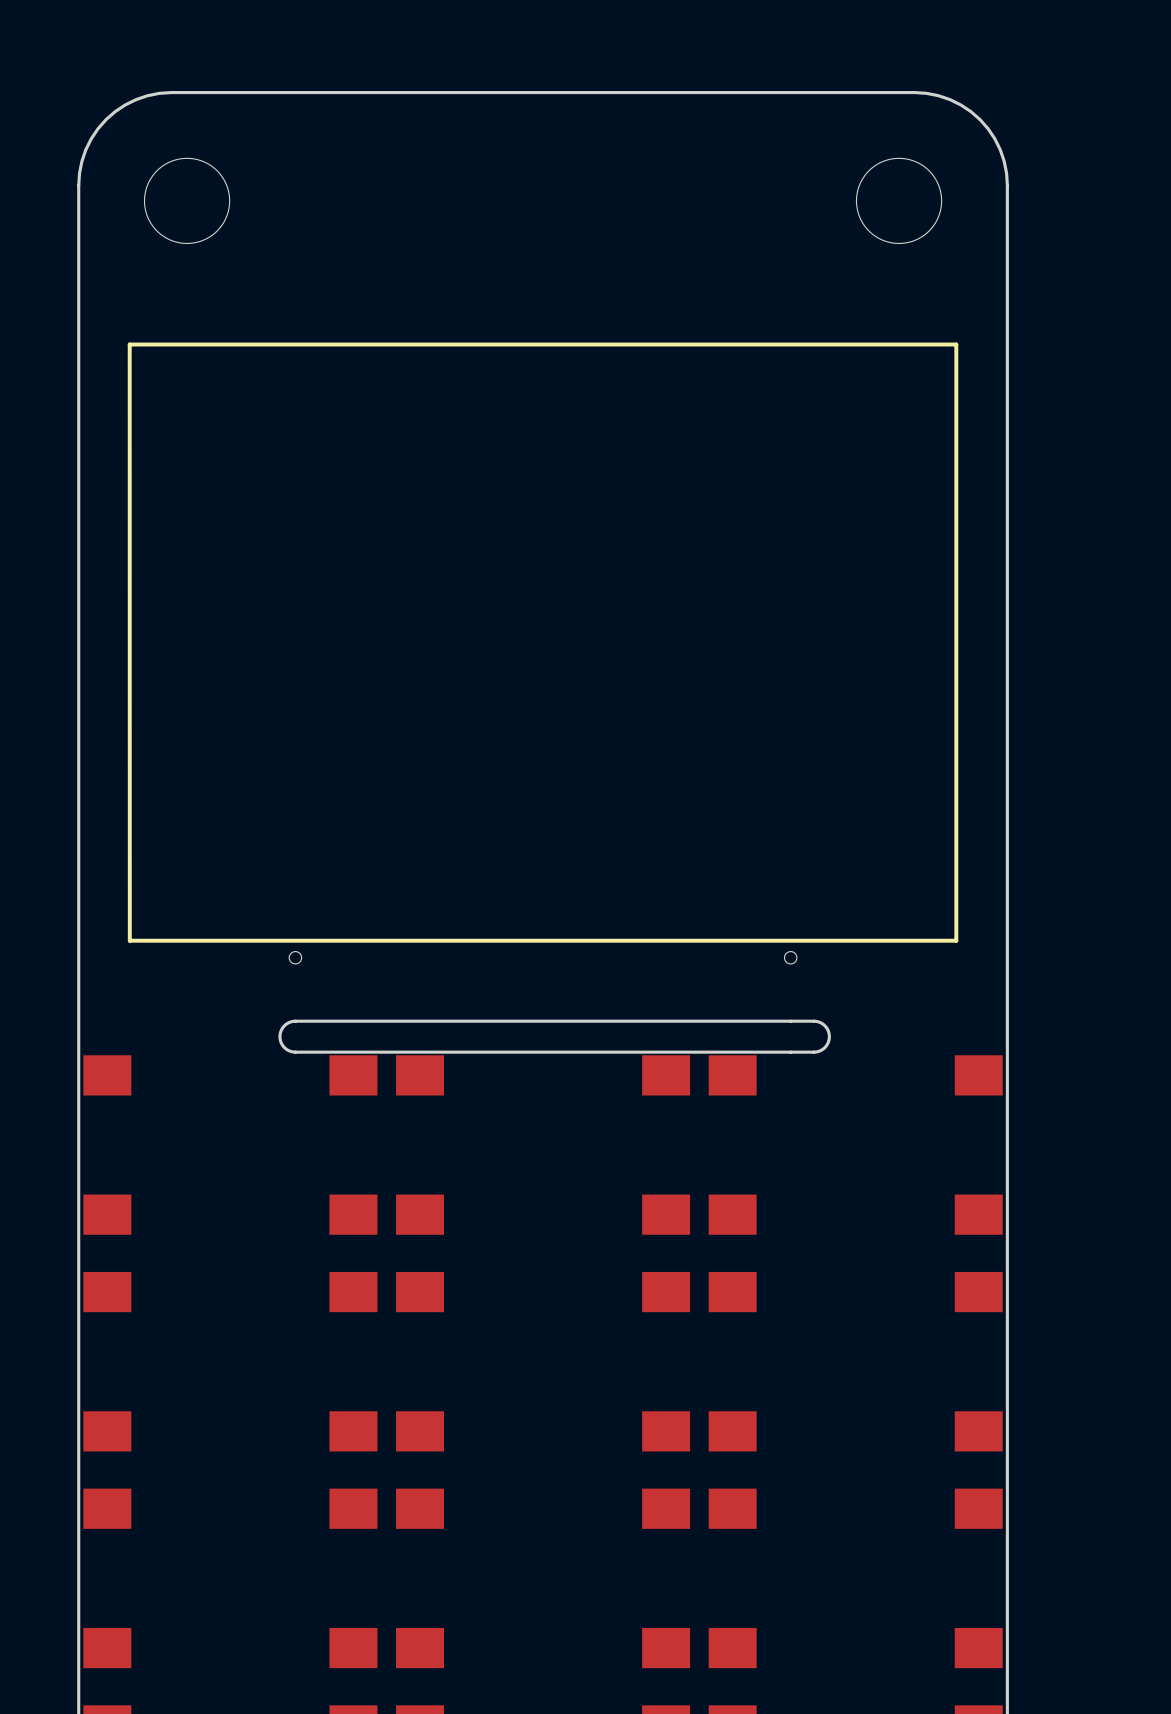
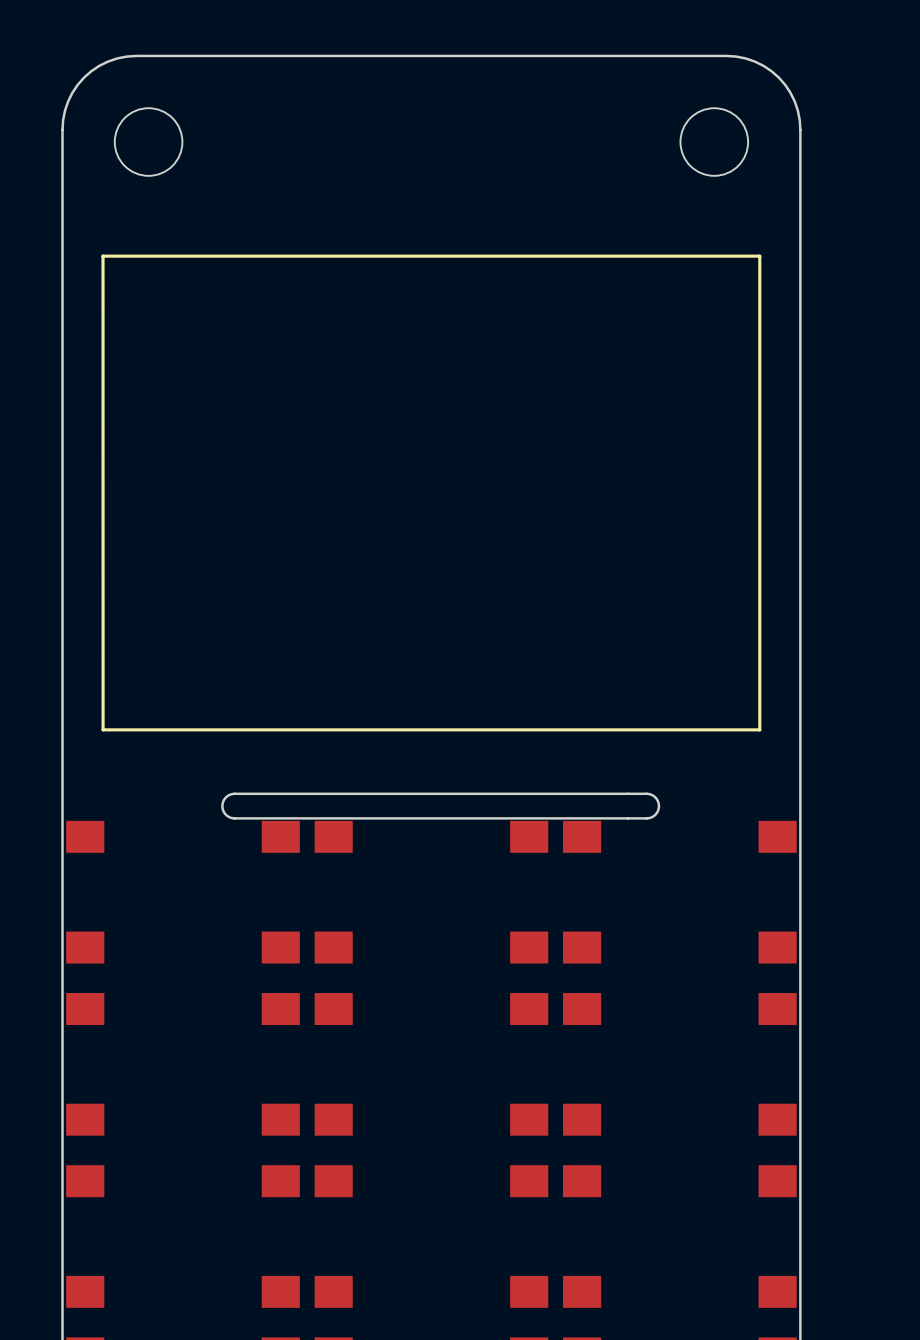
part footprint: [127, 342, 959, 964] -> [101, 254, 762, 732]

